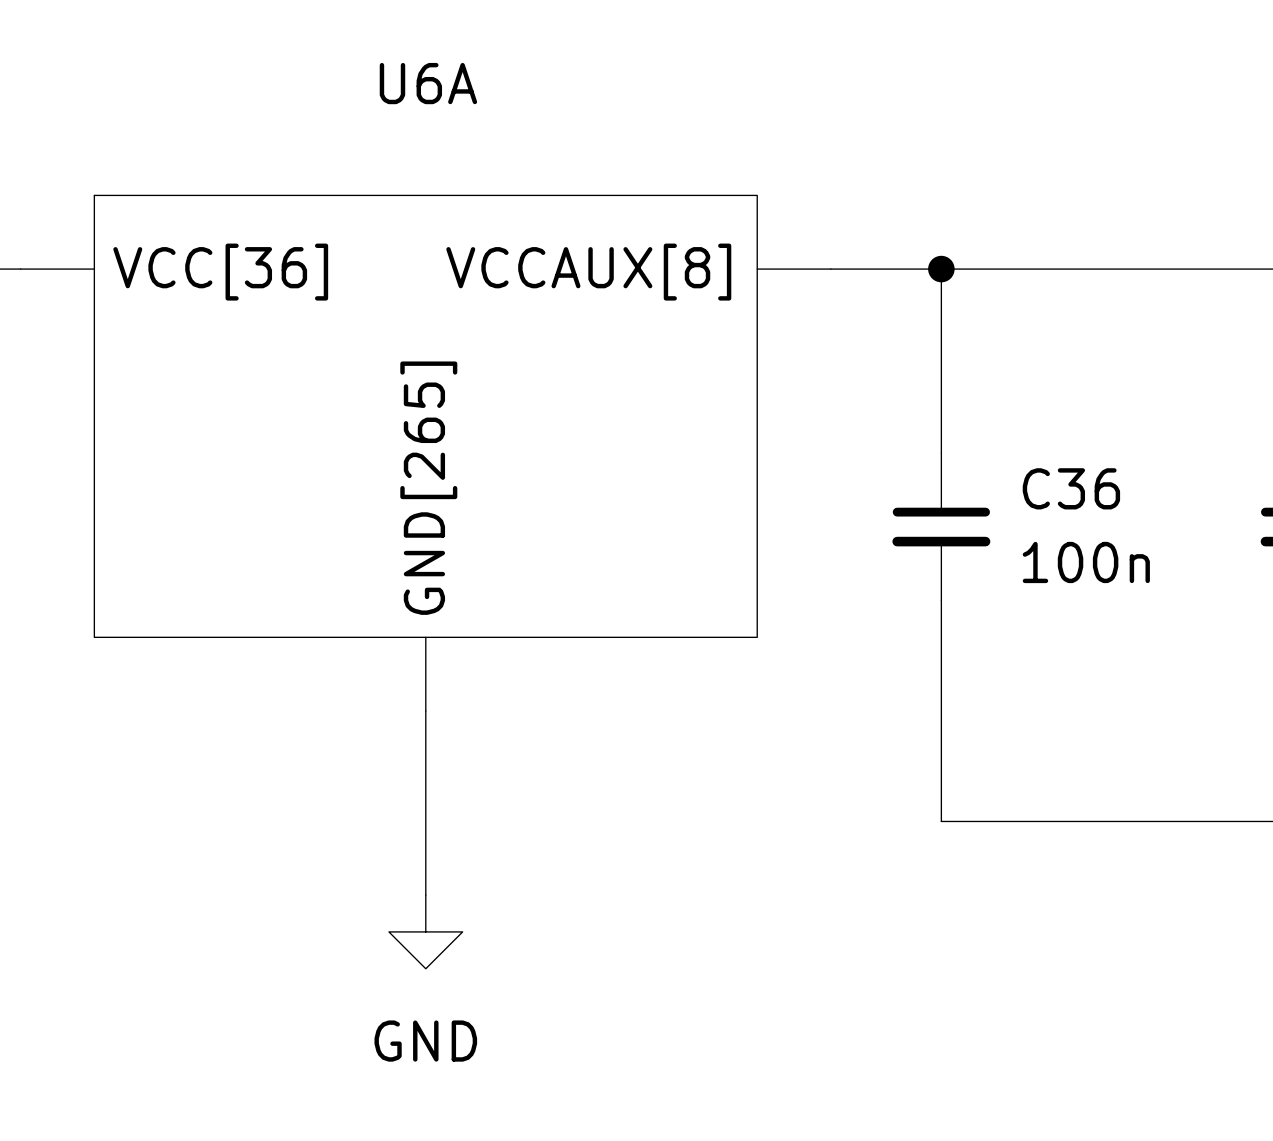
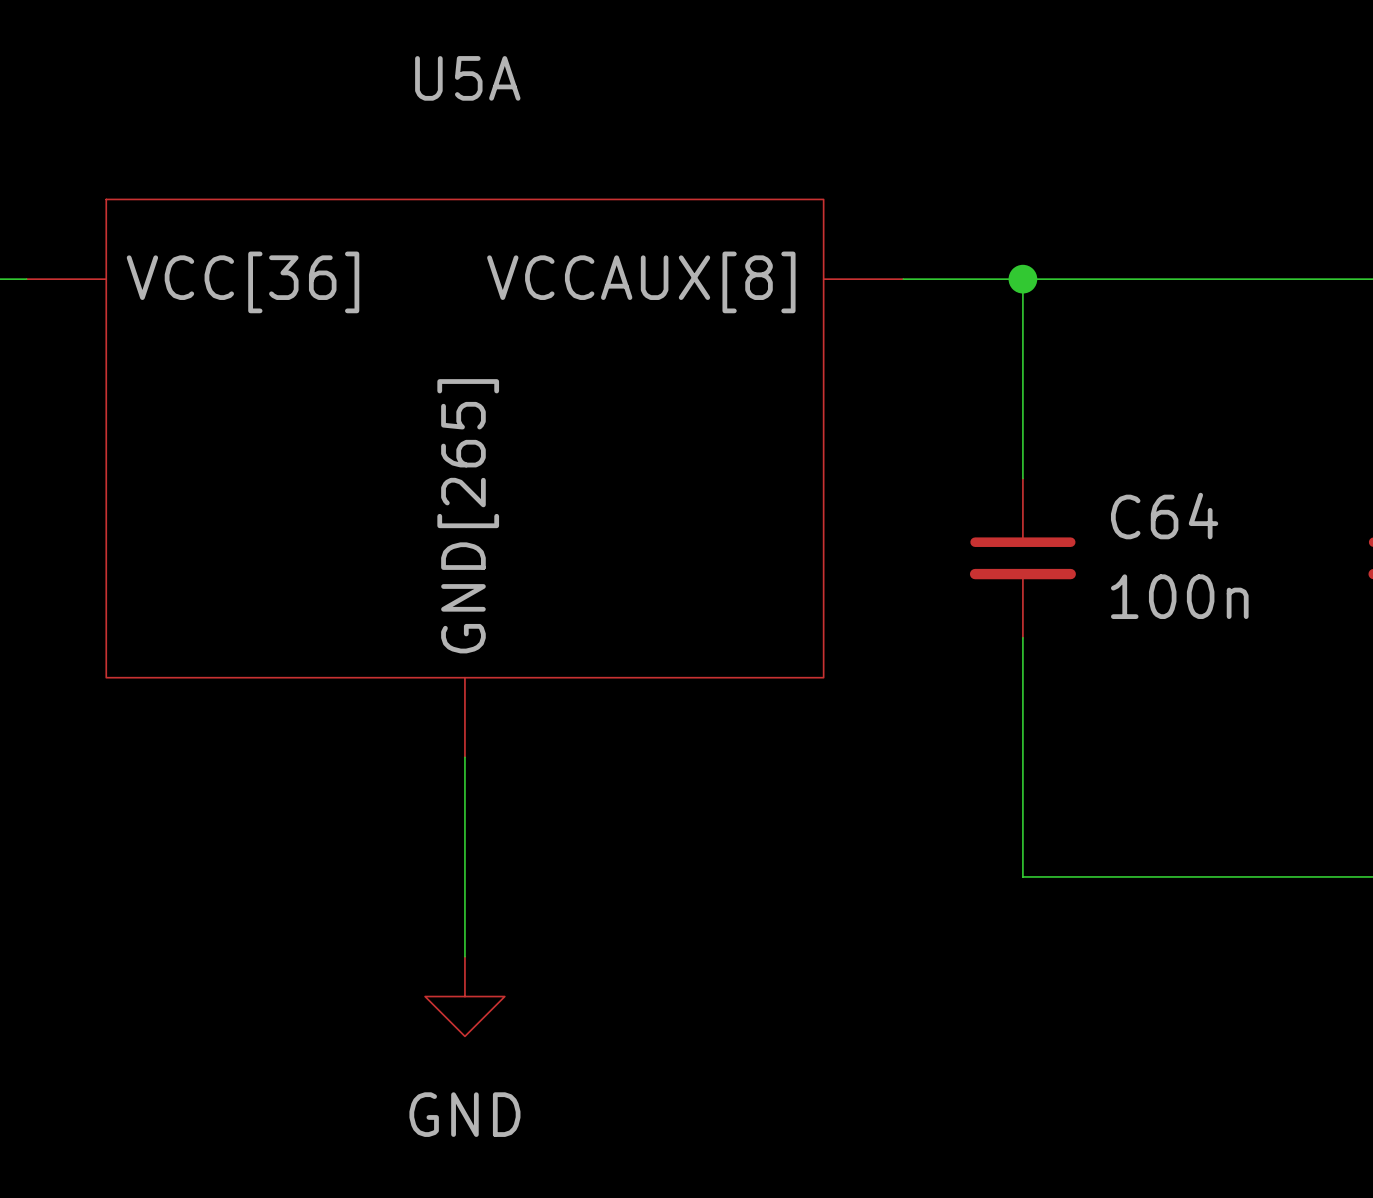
U6A name: U6A (428, 83) -> U5A (467, 78)
C36 name: C36 (1071, 488) -> C64 (1164, 516)

